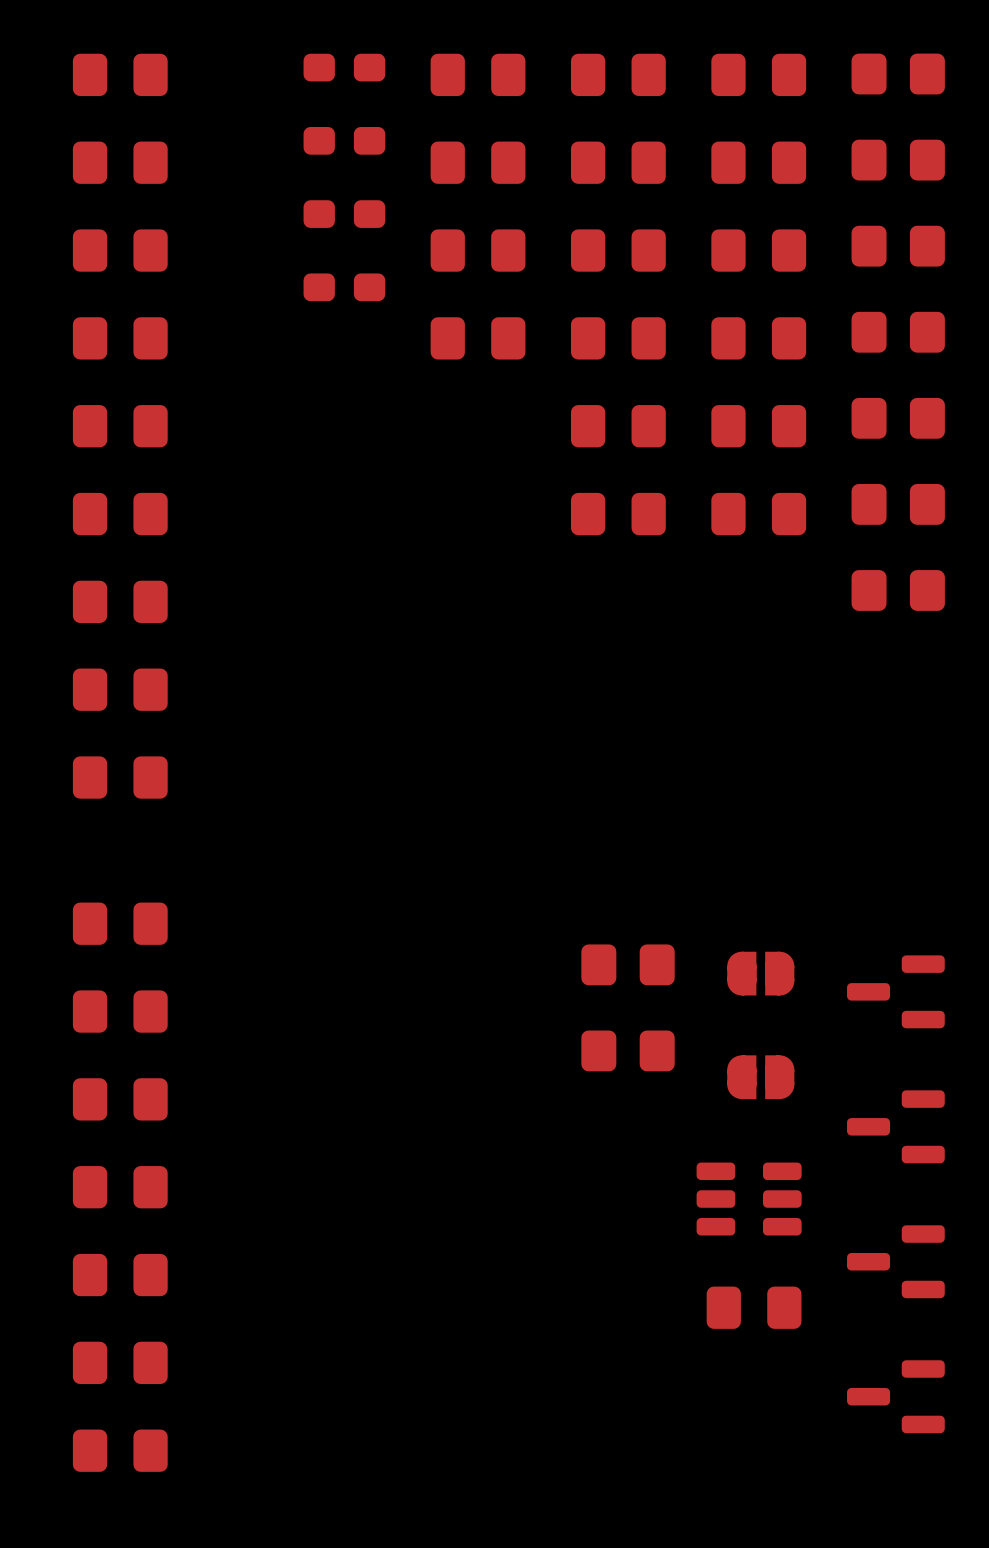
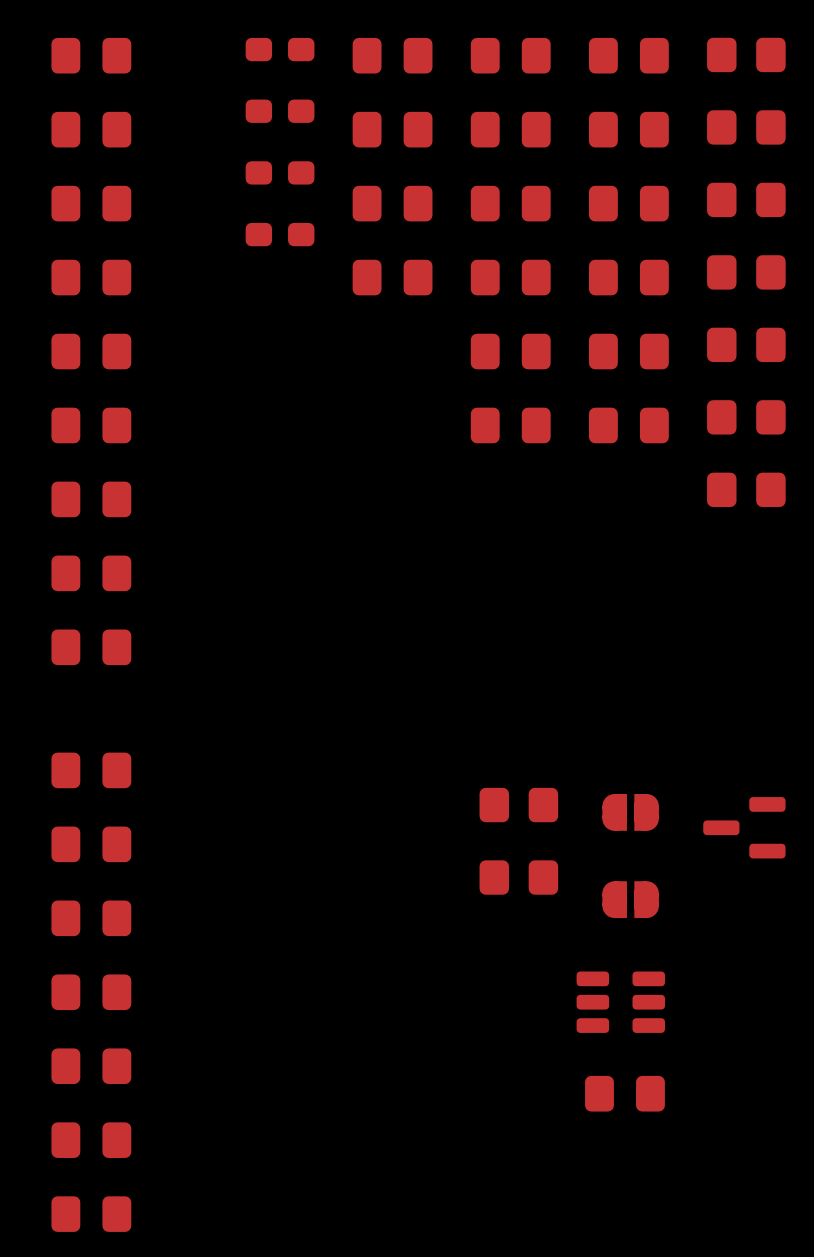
part: (895, 1126) -> none
part: (895, 1261) -> none
part: (895, 1396) -> none

